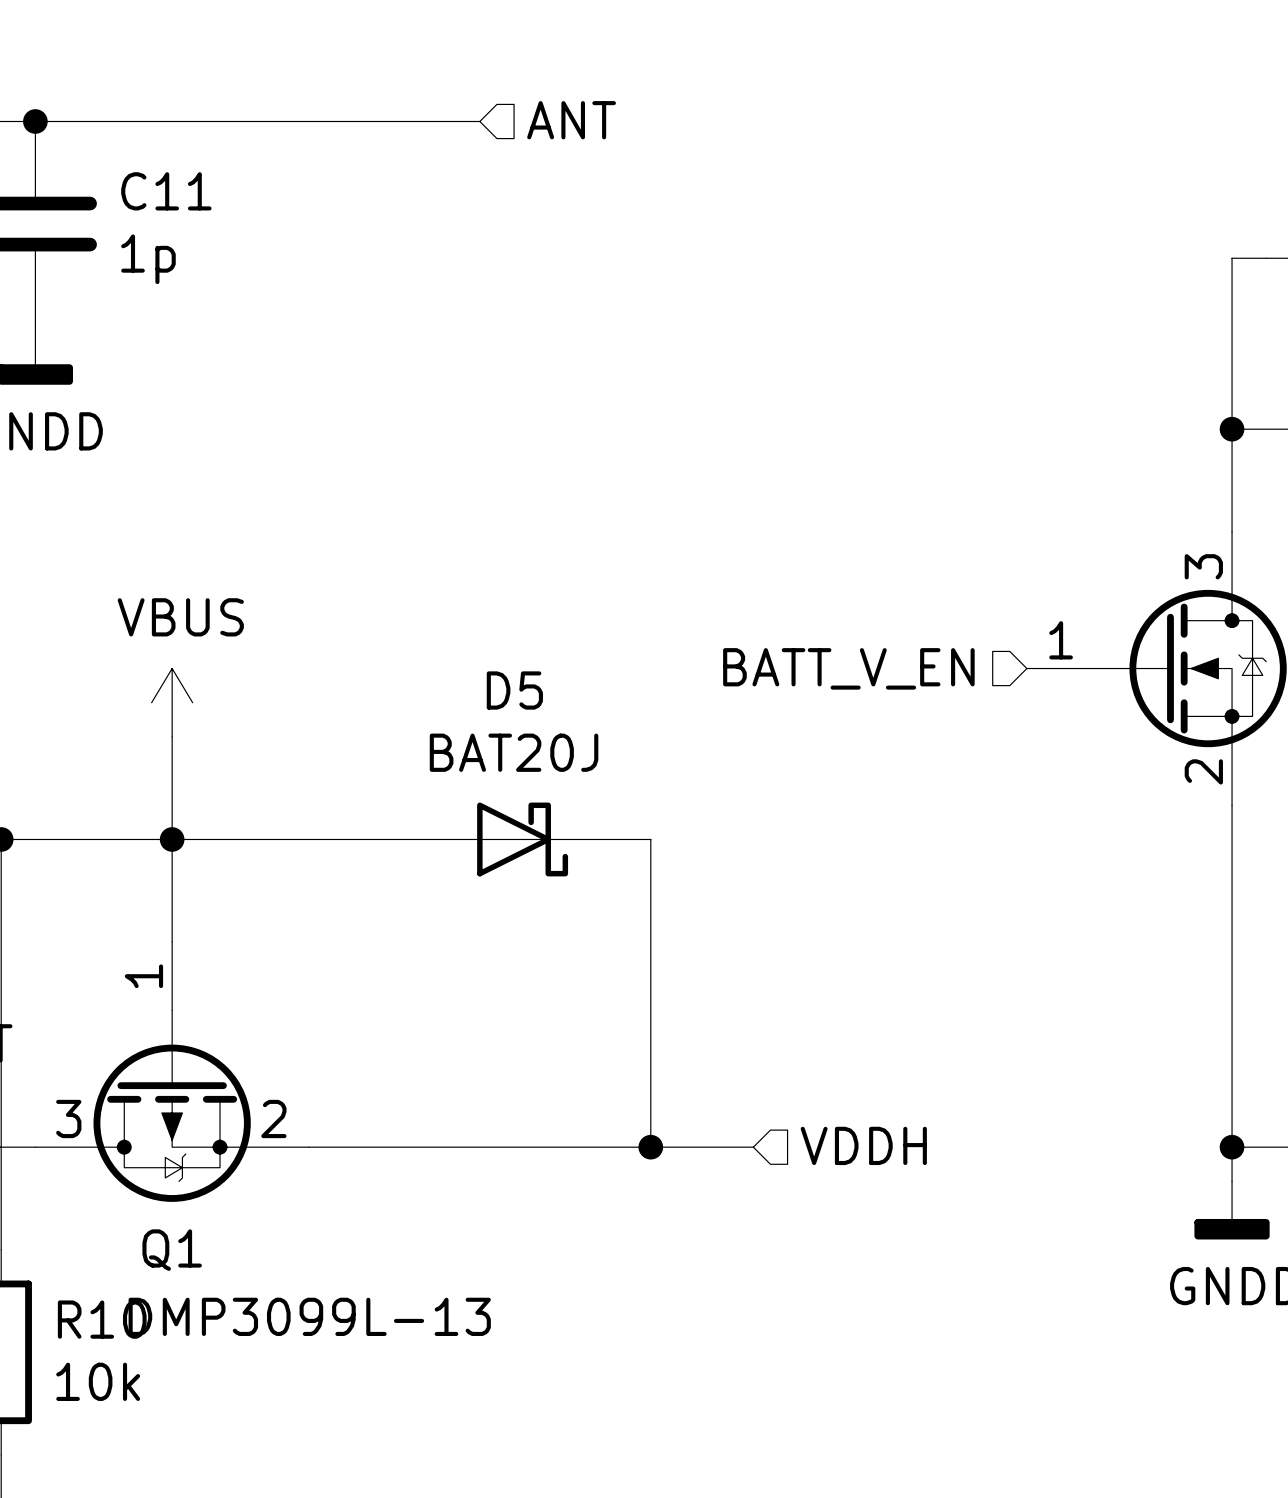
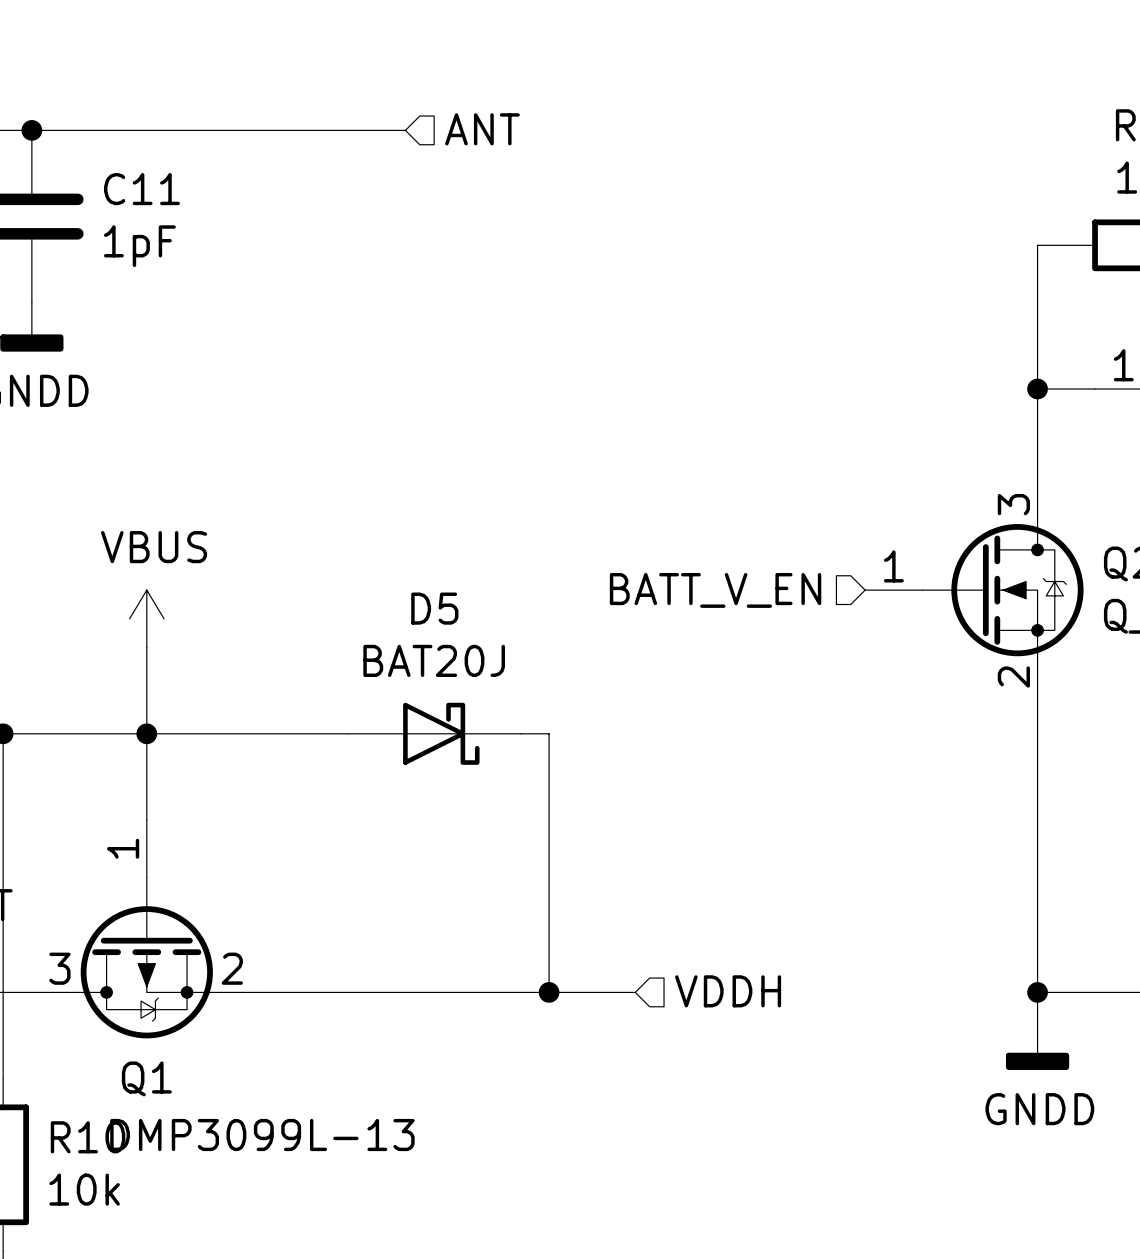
C11 value: 1p (148, 259) -> 1pF (139, 246)

